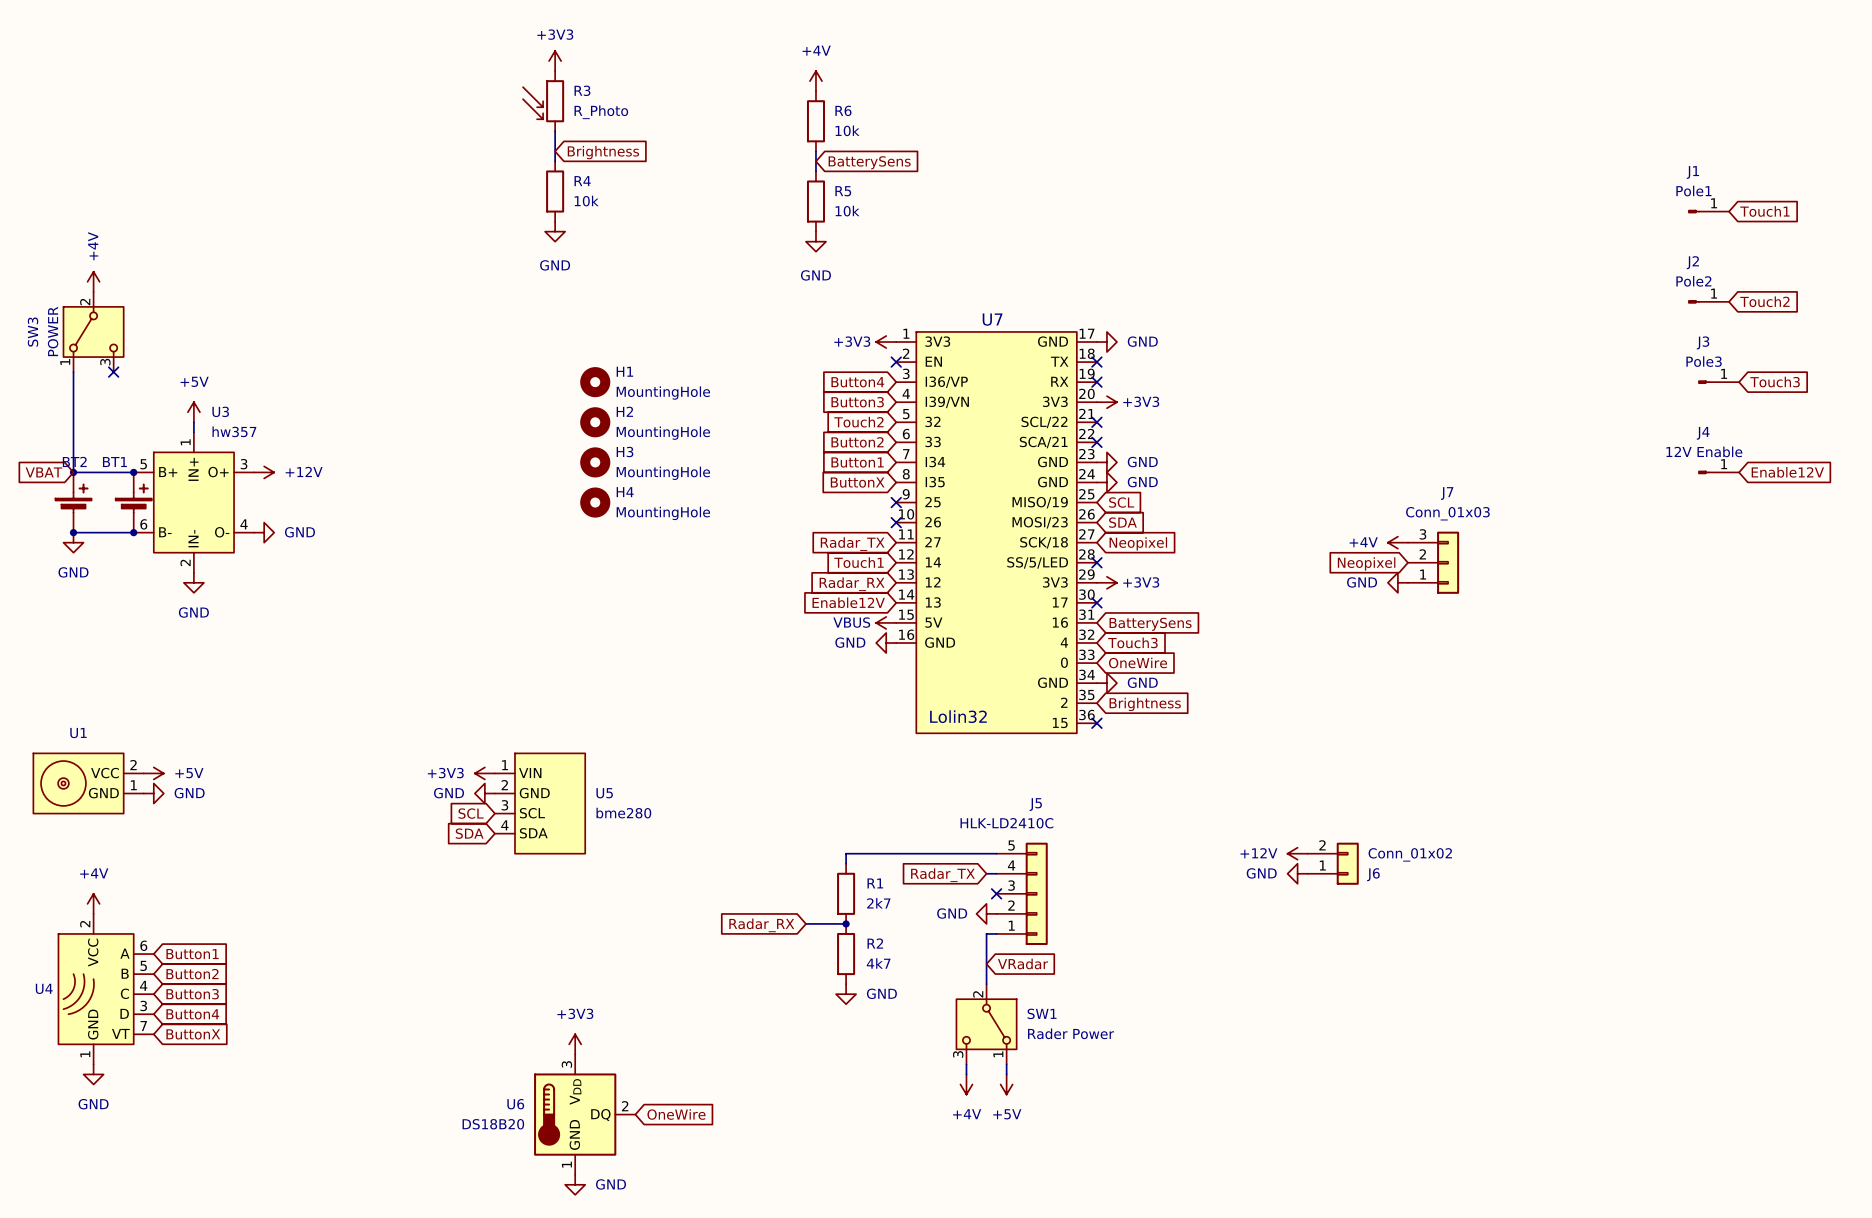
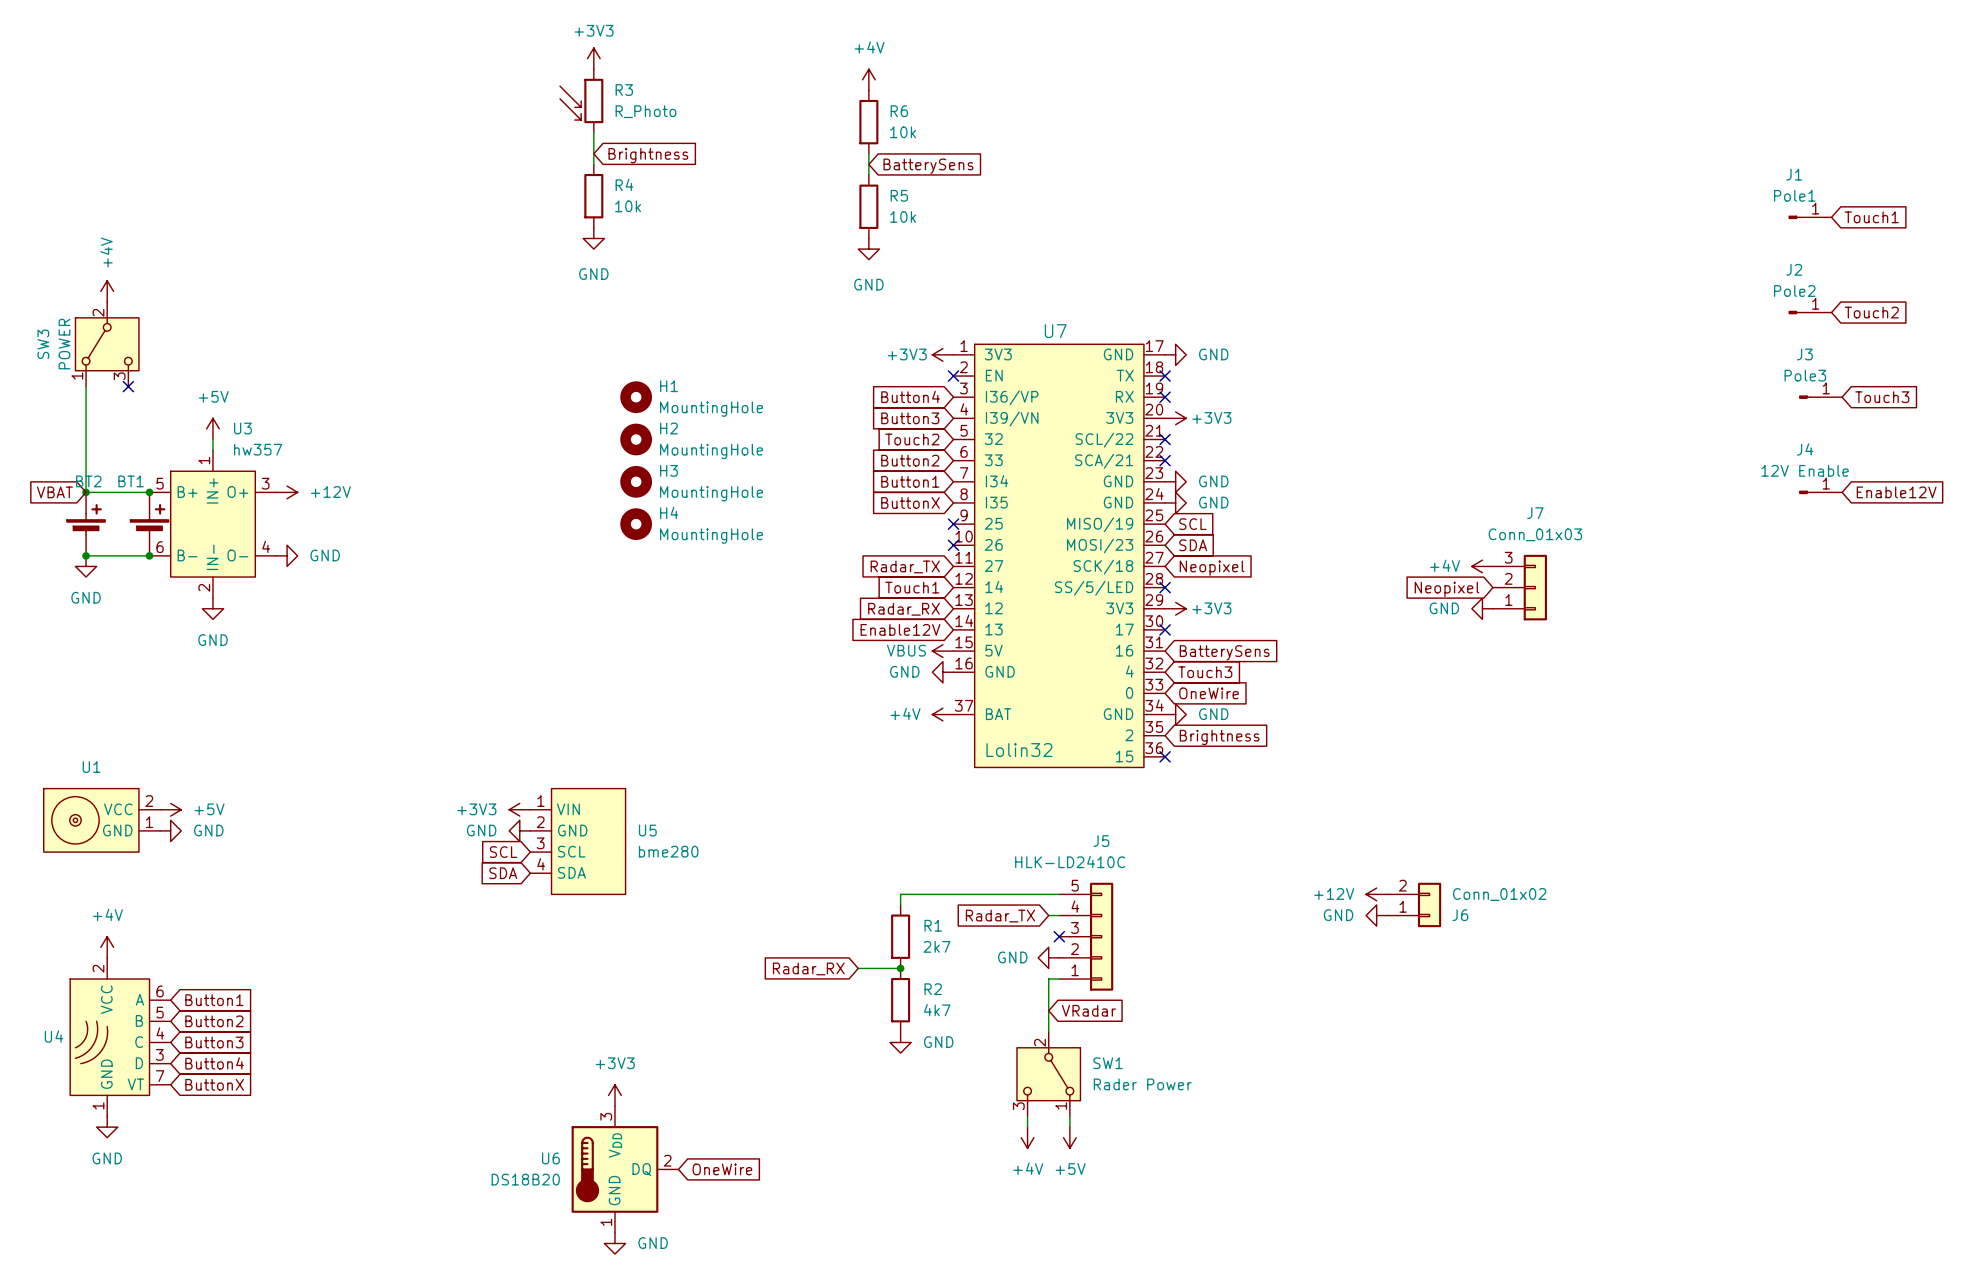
U7 symbol: [896, 331, 1097, 734] -> [953, 344, 1166, 768]
power symbol: none -> +4V (942, 714)

